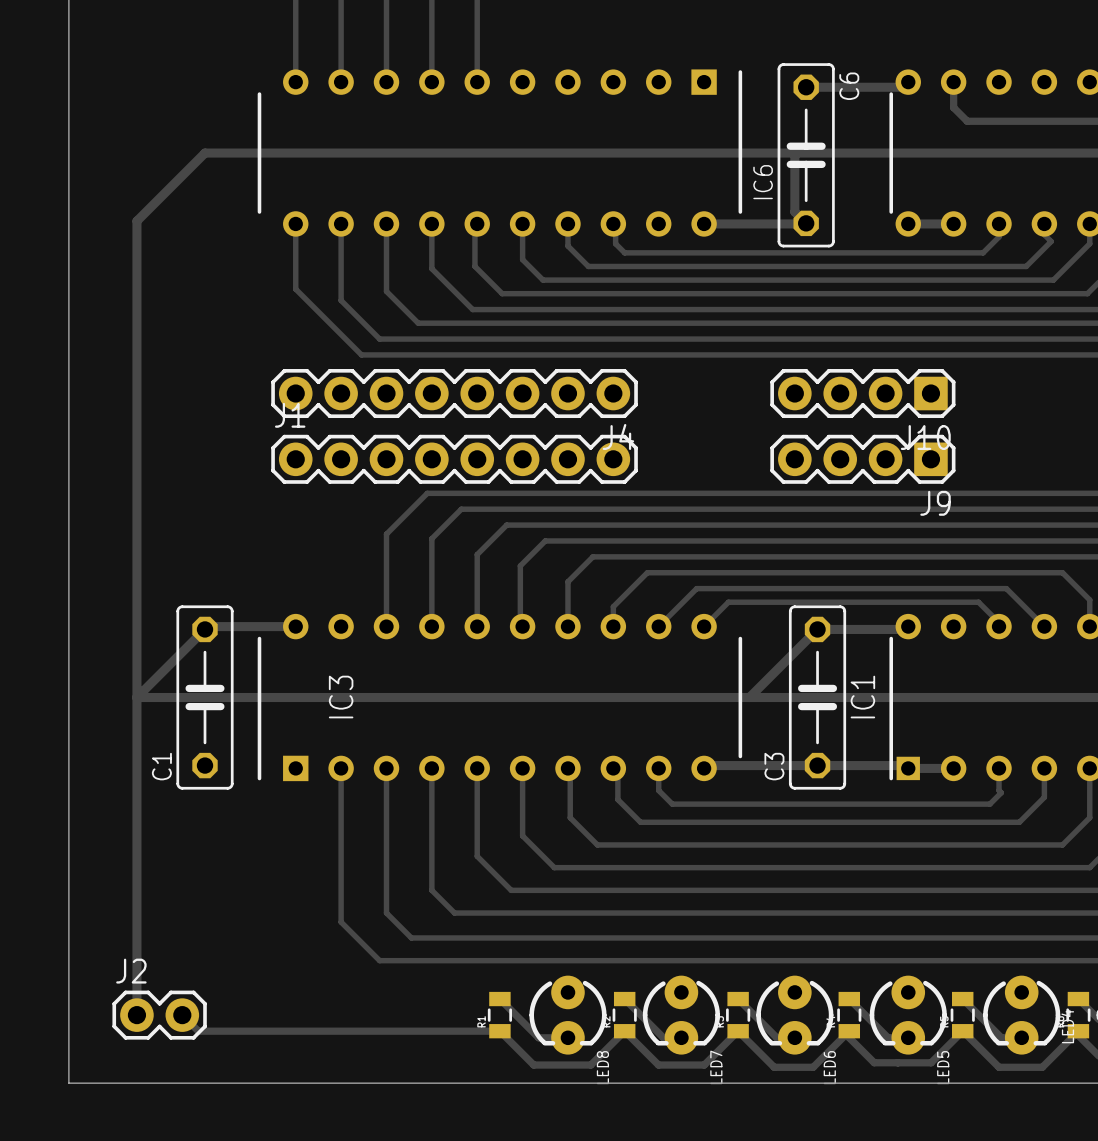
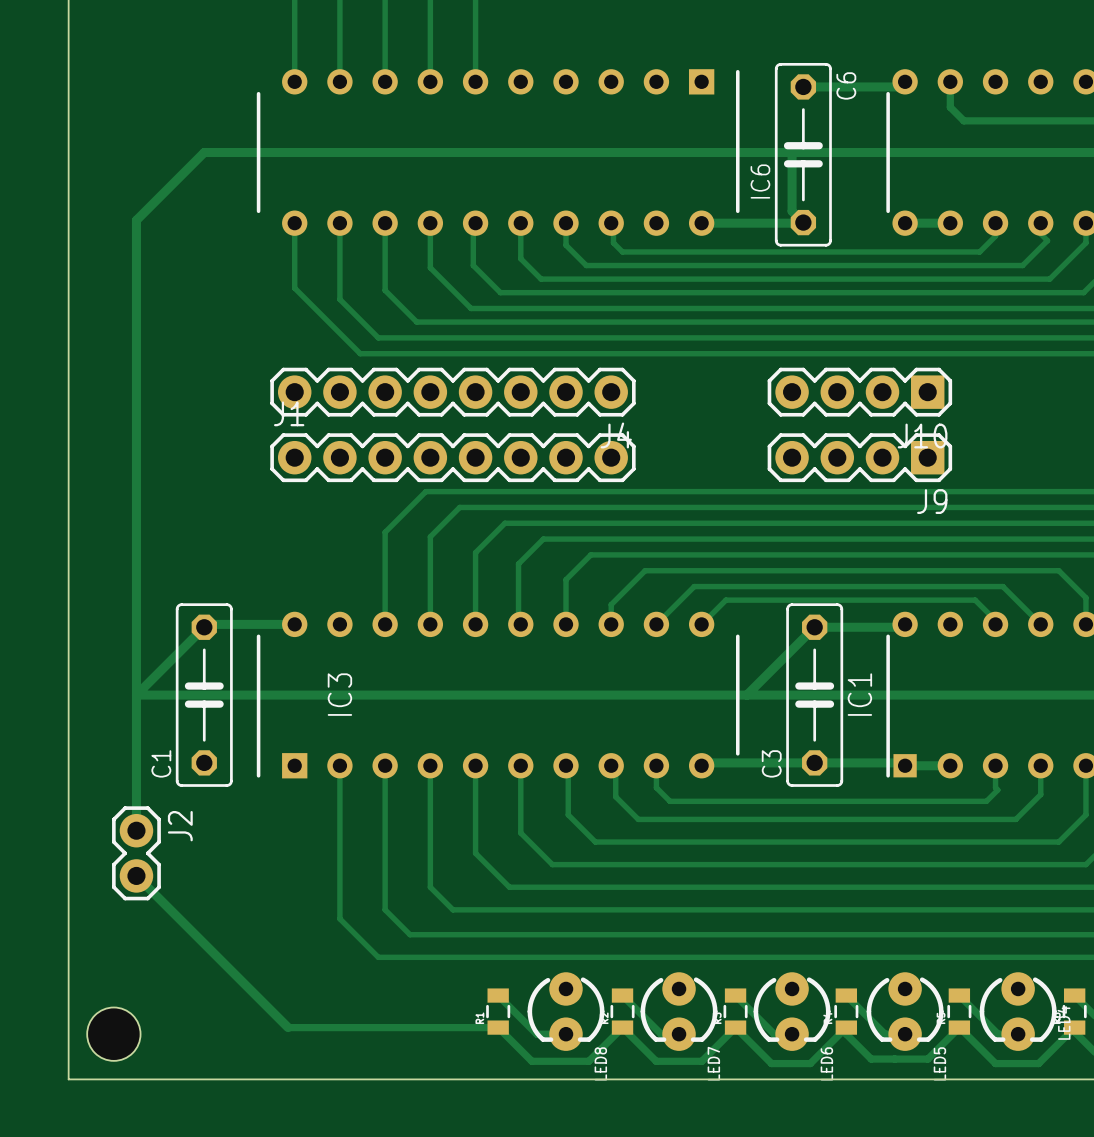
track: (136, 833) (136, 1015) -> none
J2 rotation: 0° (159, 1015) -> 90° clockwise (136, 853)
J2 position: (159, 1015) -> (136, 853)
track: (182, 1015) (198, 1031) (289, 1031) -> (136, 875) (288, 1027)
hole: none -> (113, 1034)

